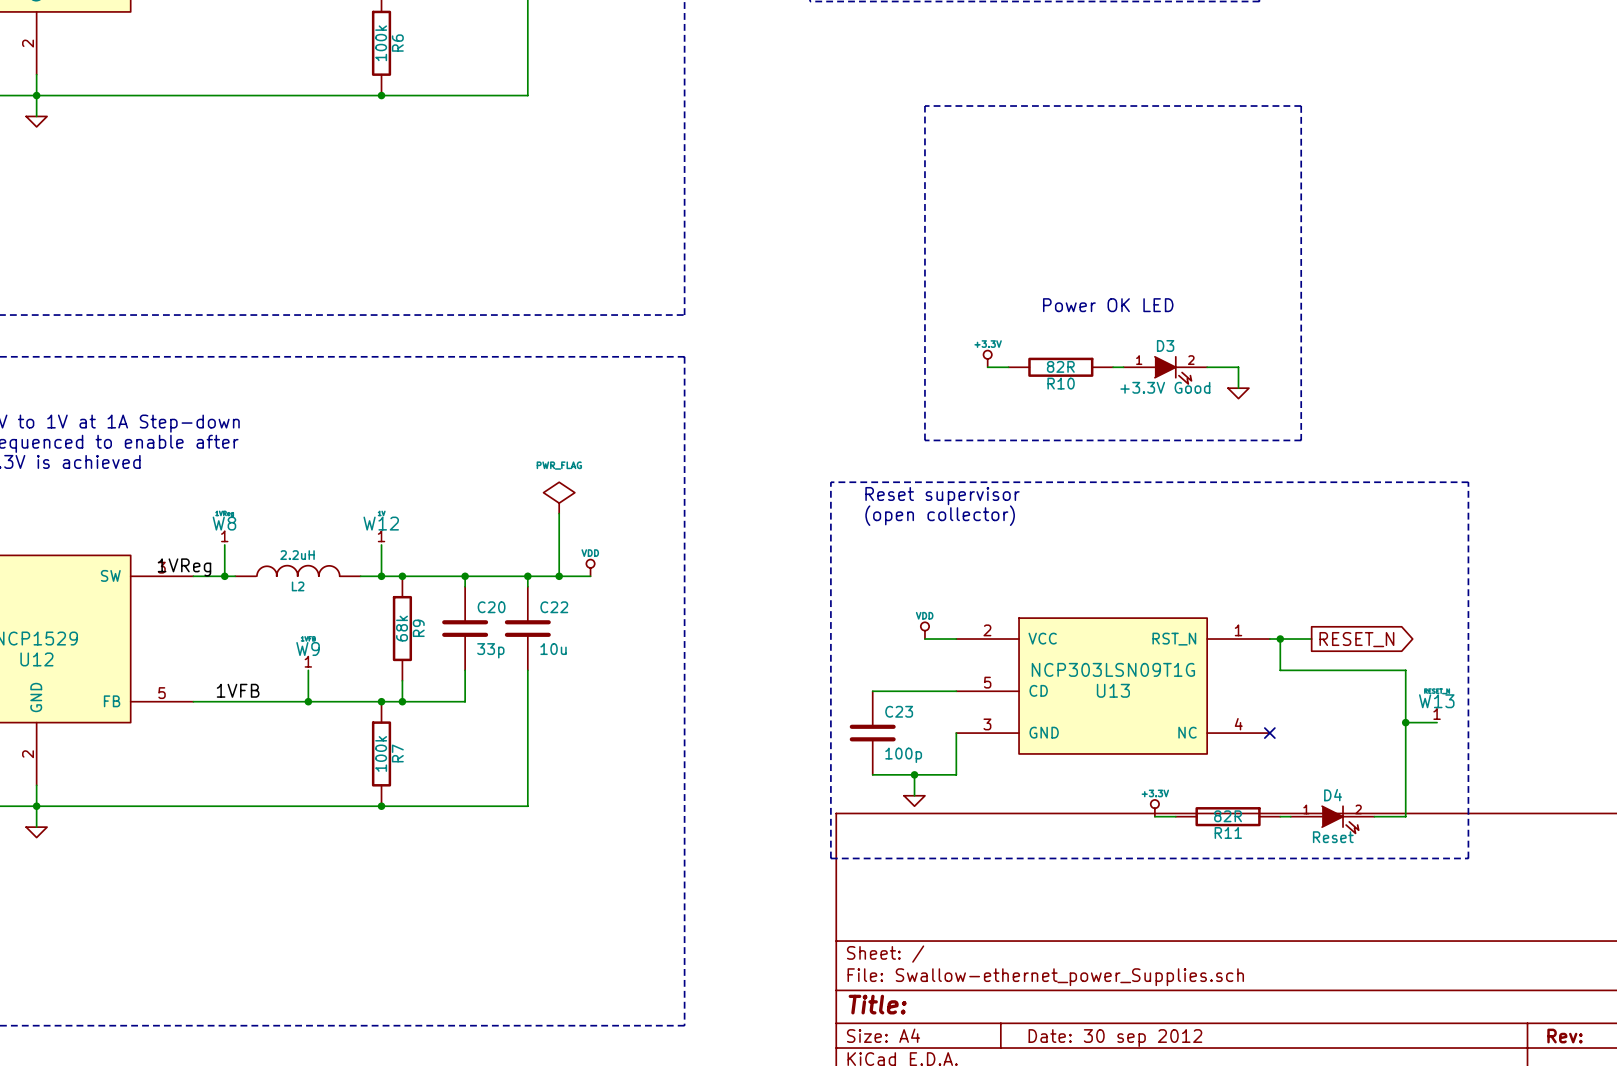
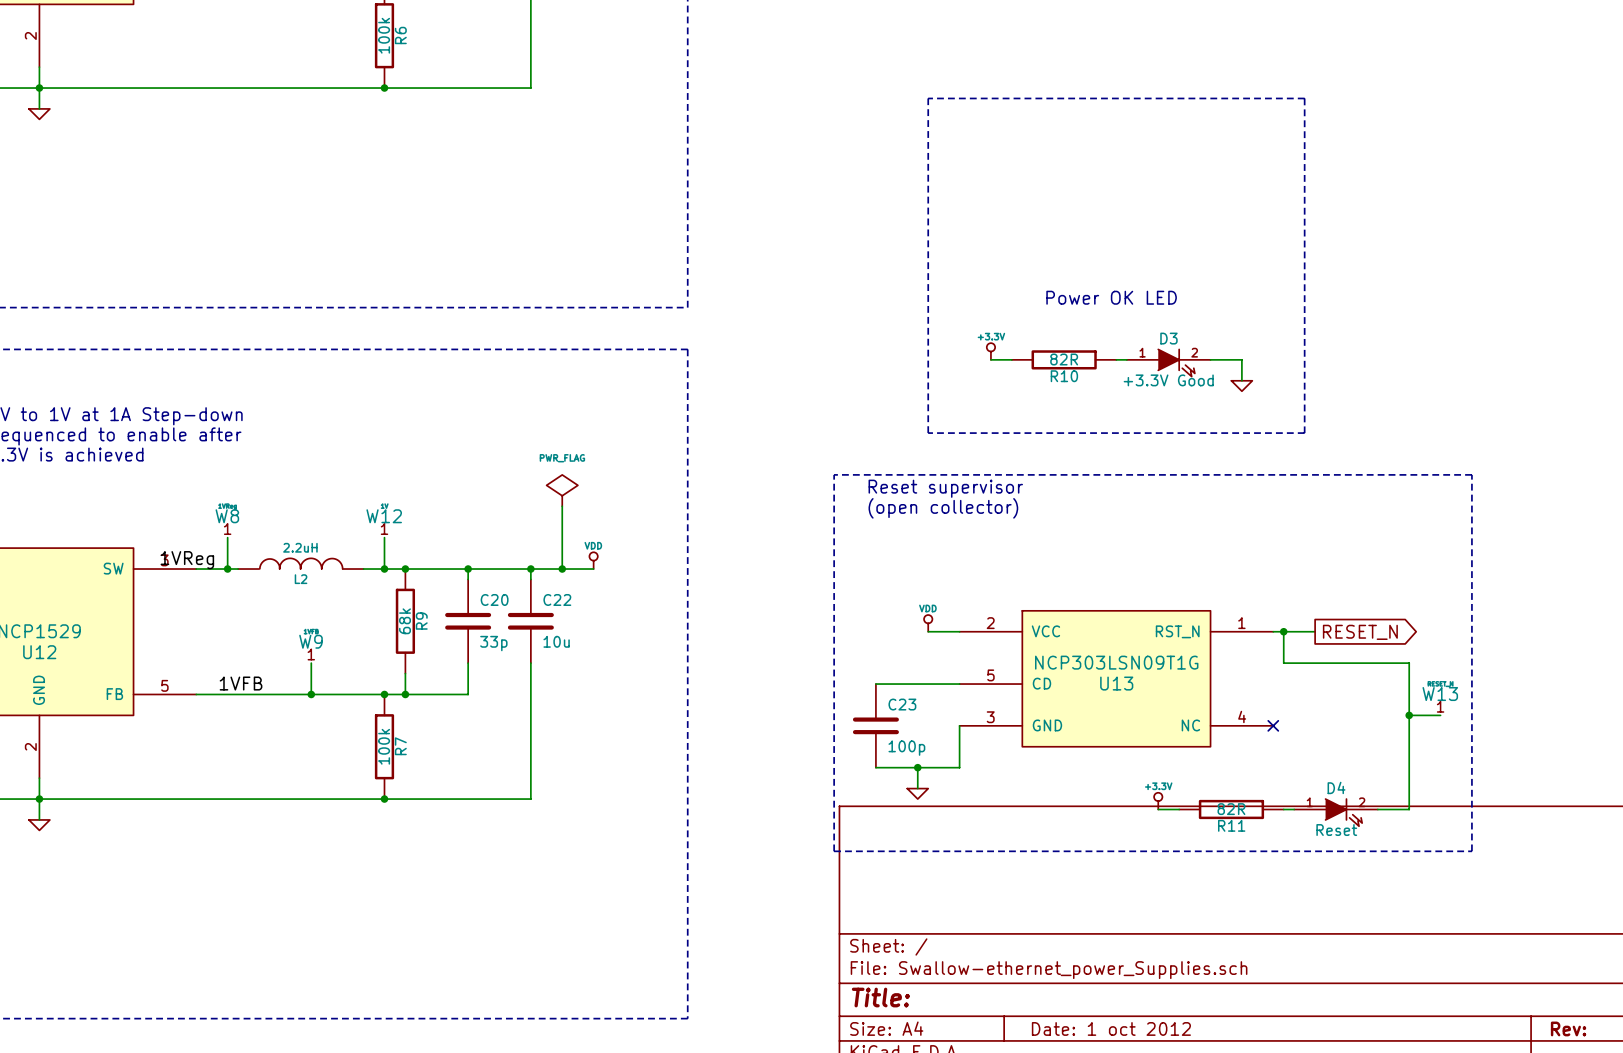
title block: Date: 30 sep 2012 (1115, 1038) -> Date: 1 oct 2012 (1111, 1028)

